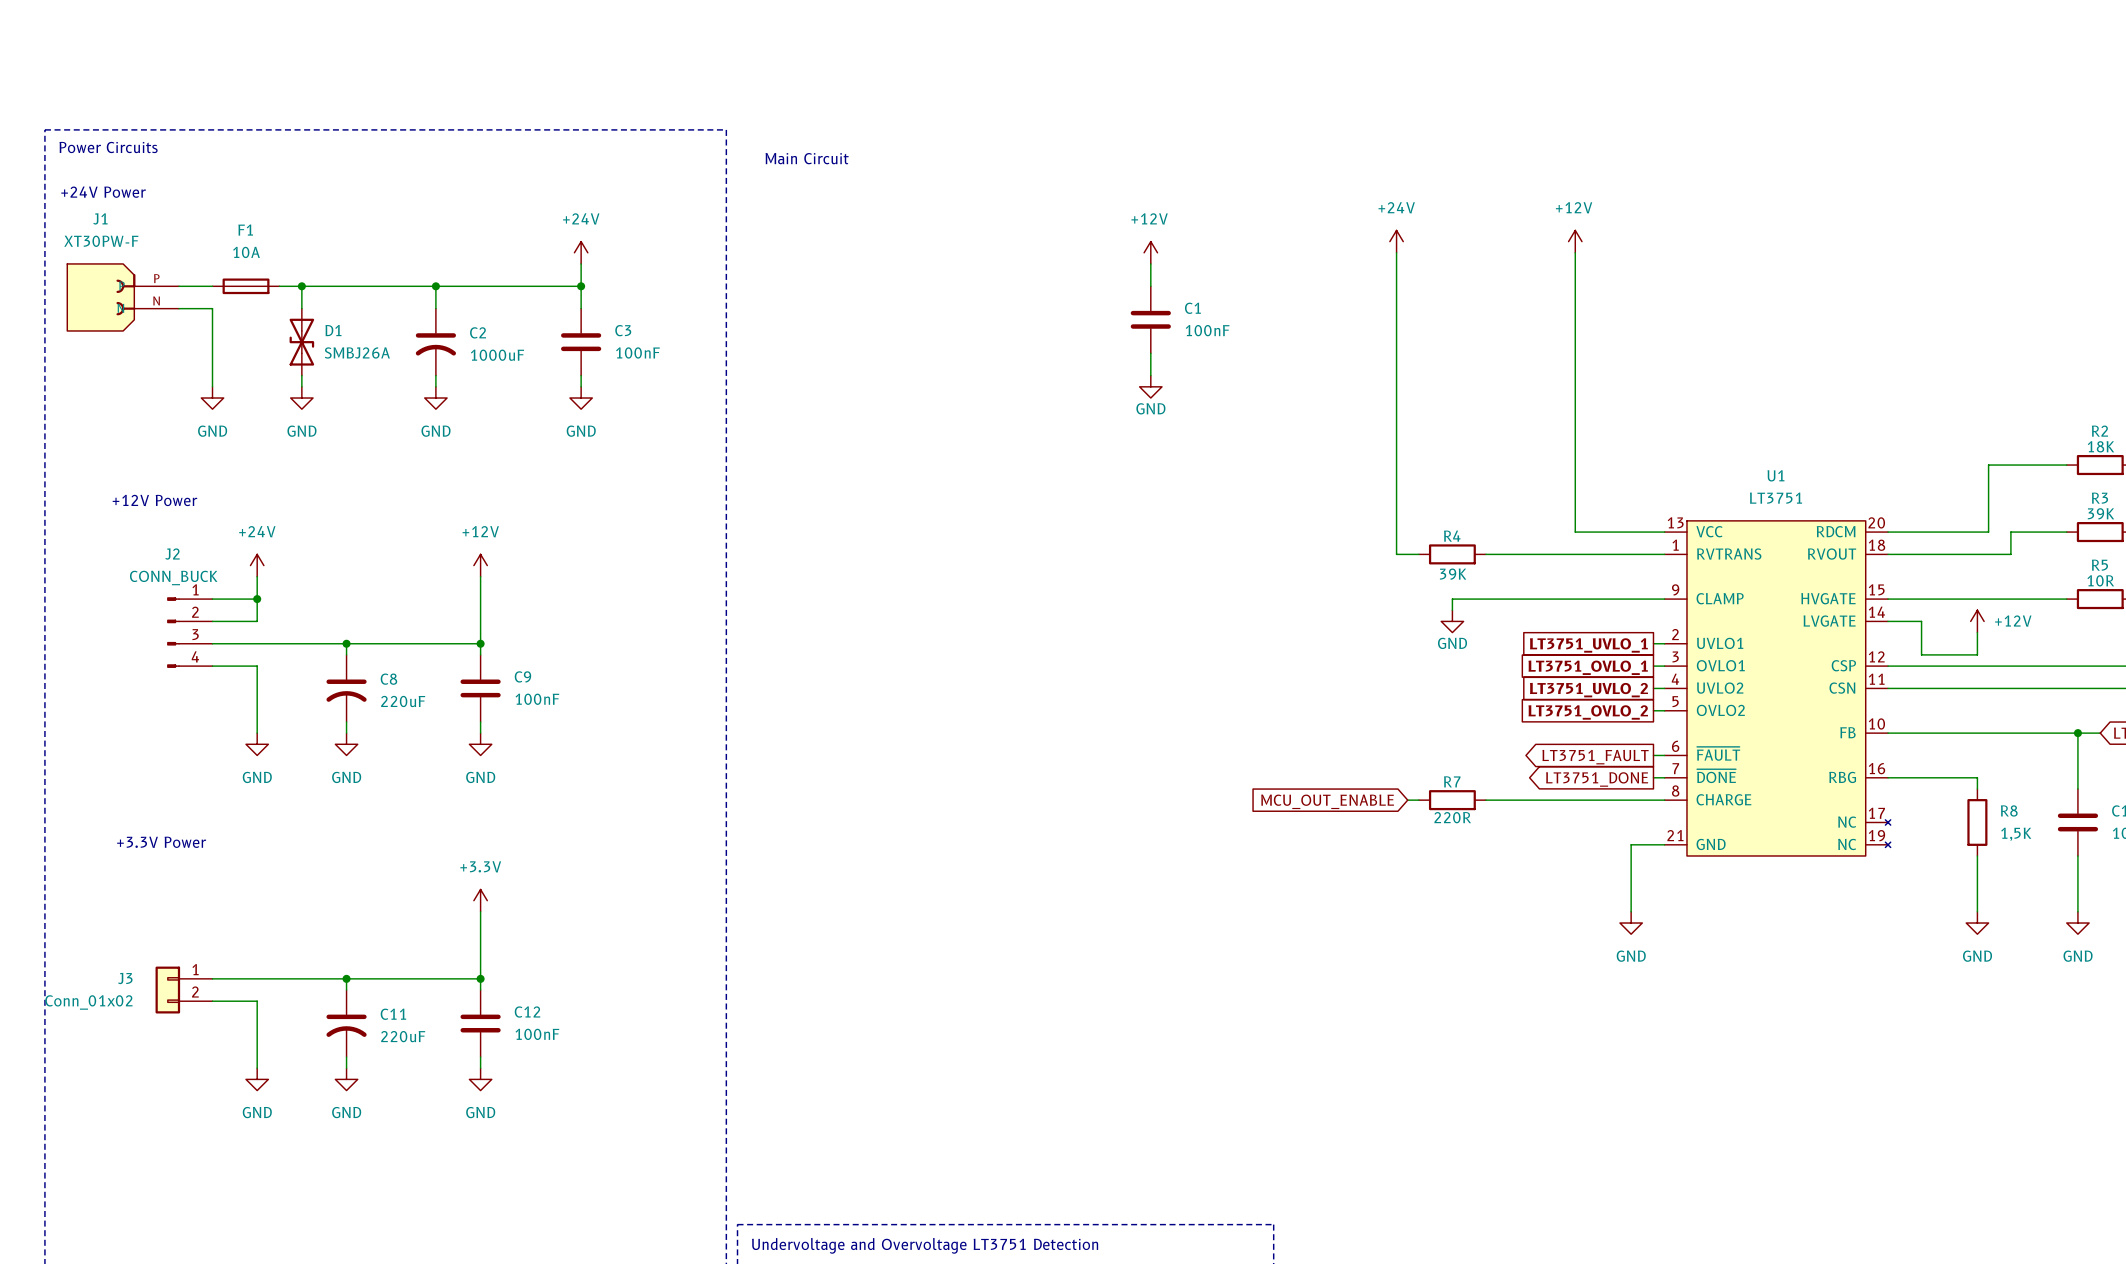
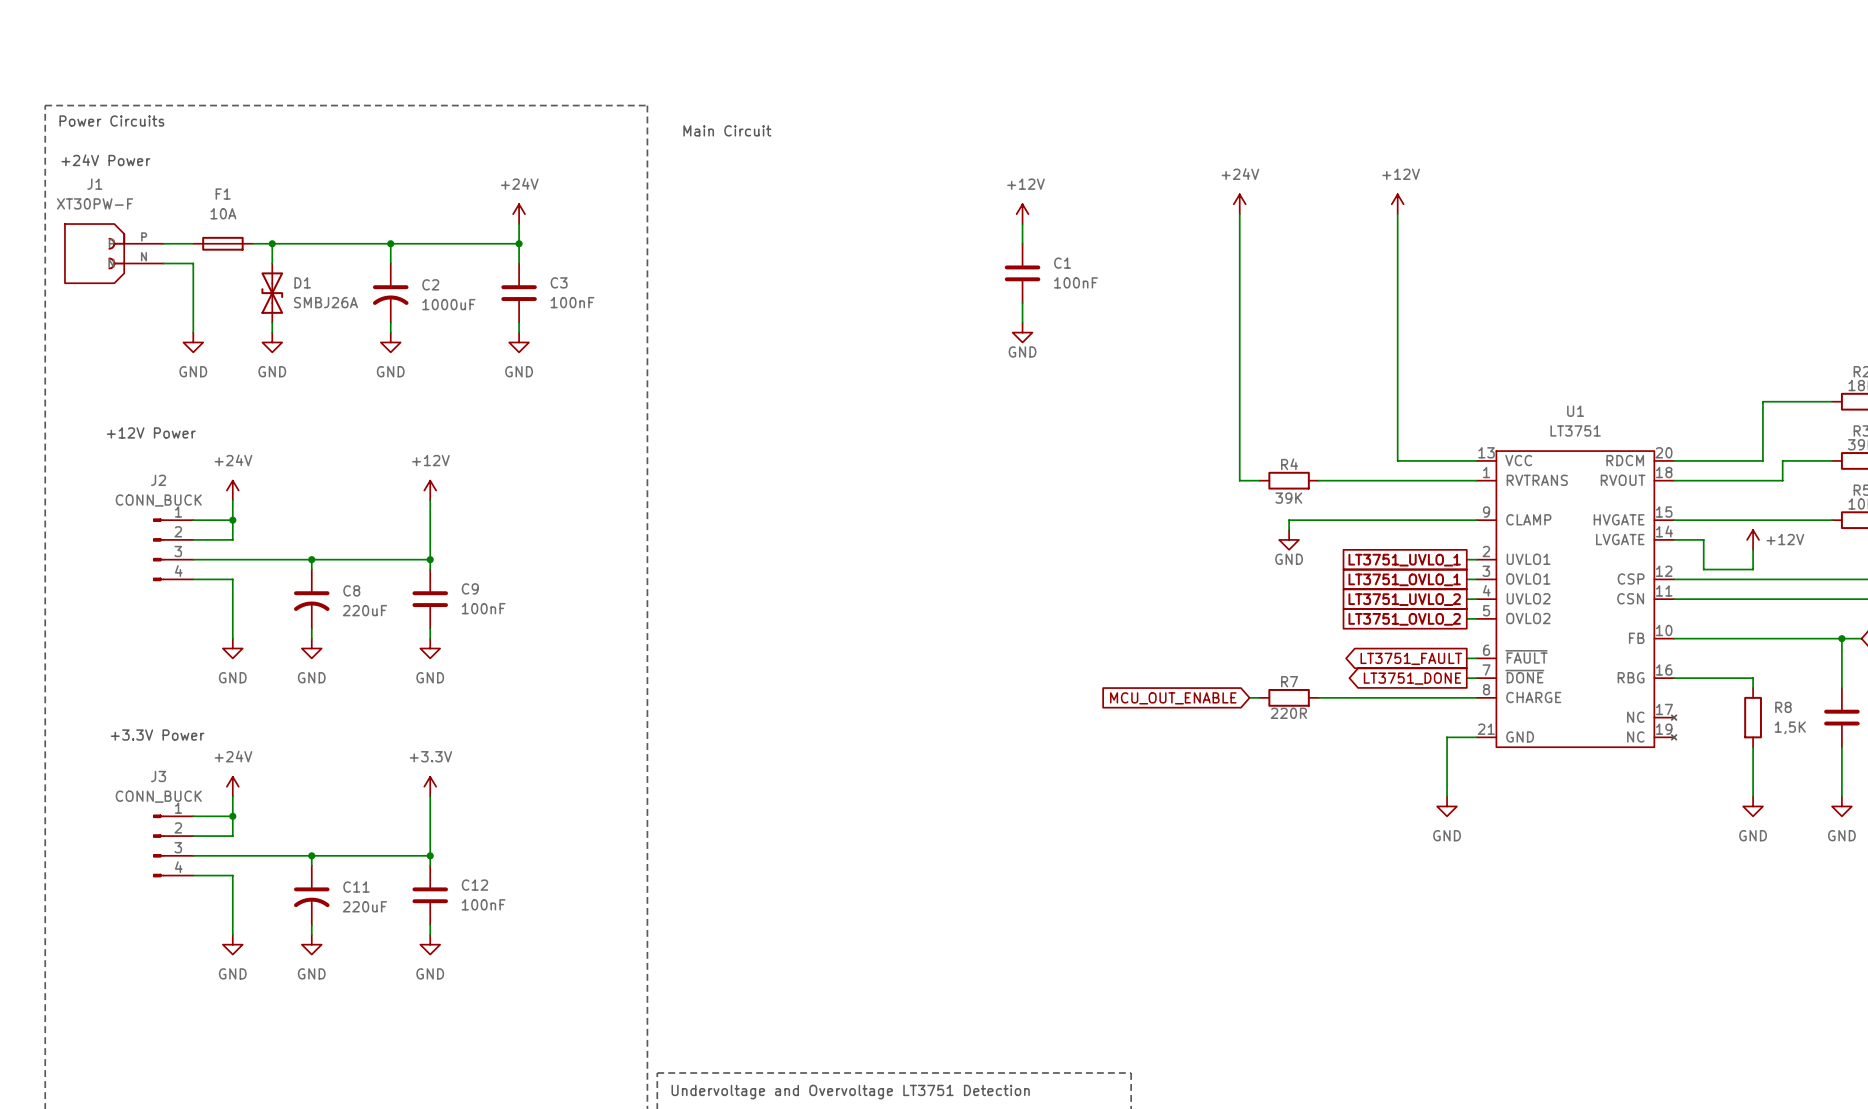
power symbol: none -> +24V (232, 786)
wire: none -> (232, 796) (232, 836) (193, 836)
wire: none -> (193, 816) (232, 816)
junction: none -> (232, 816)
J3 symbol: [155, 966, 213, 1014] -> [153, 814, 194, 878]
J3 name position: J3 (125, 978) -> J3 (158, 776)
J3 value: Conn_01x02 (88, 1002) -> CONN_BUCK (158, 796)

